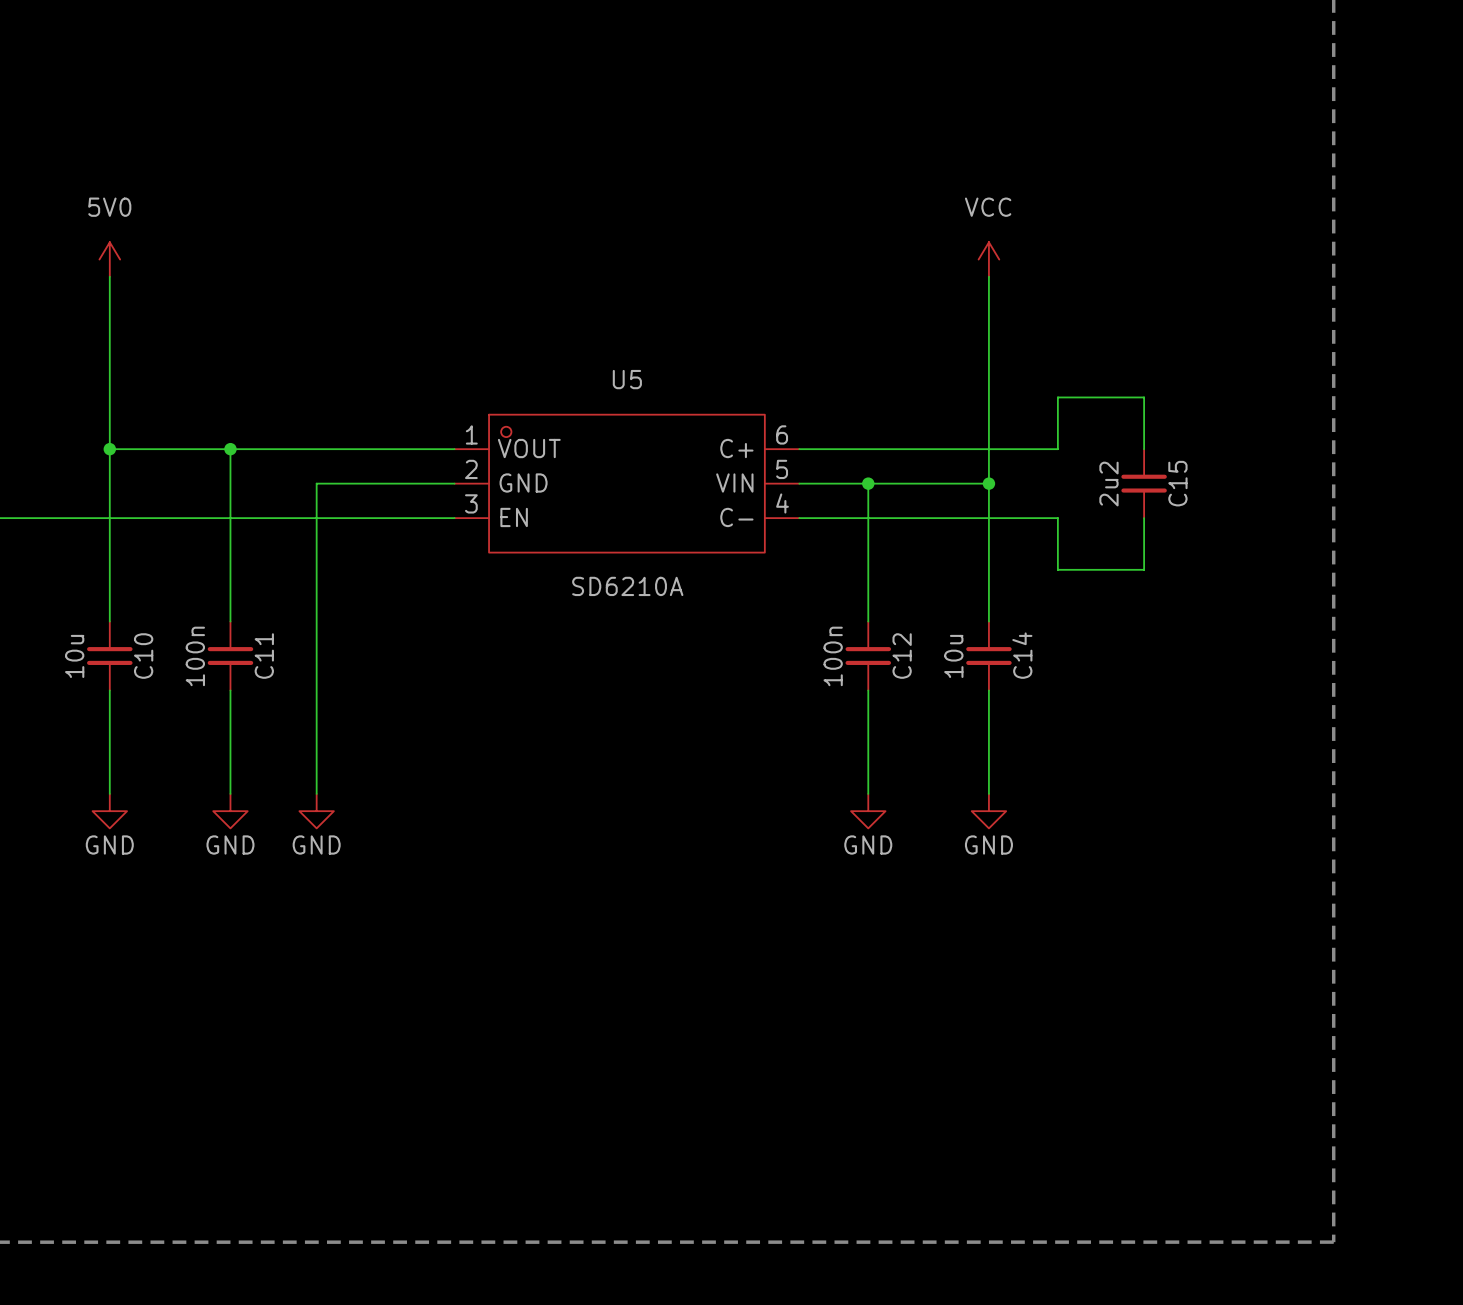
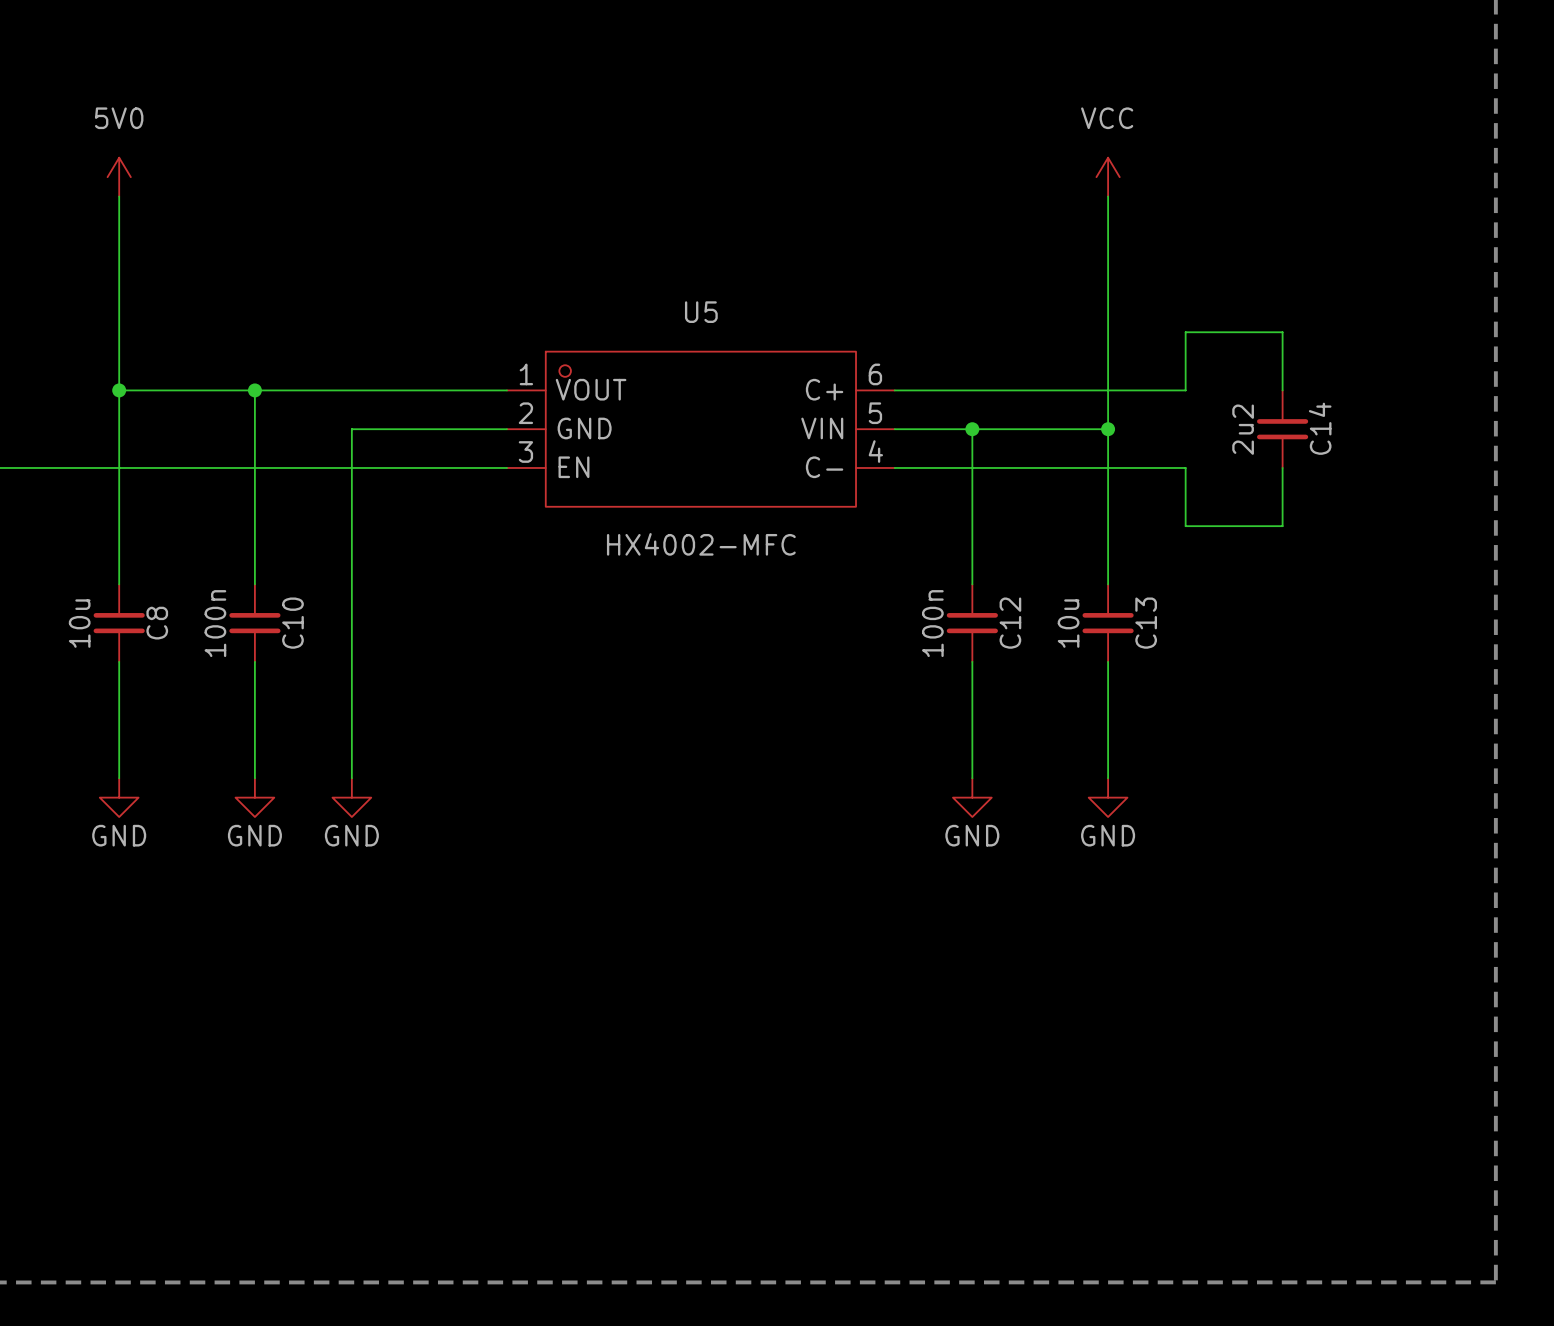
C15 name: C15 (1177, 483) -> C14 (1320, 428)
U5 value: SD6210A (627, 586) -> HX4002-MFC (701, 544)
C14 name: C14 (1022, 655) -> C13 (1146, 623)
C10 name: C10 (143, 656) -> C8 (157, 623)
C11 name: C11 (264, 656) -> C10 (292, 623)

